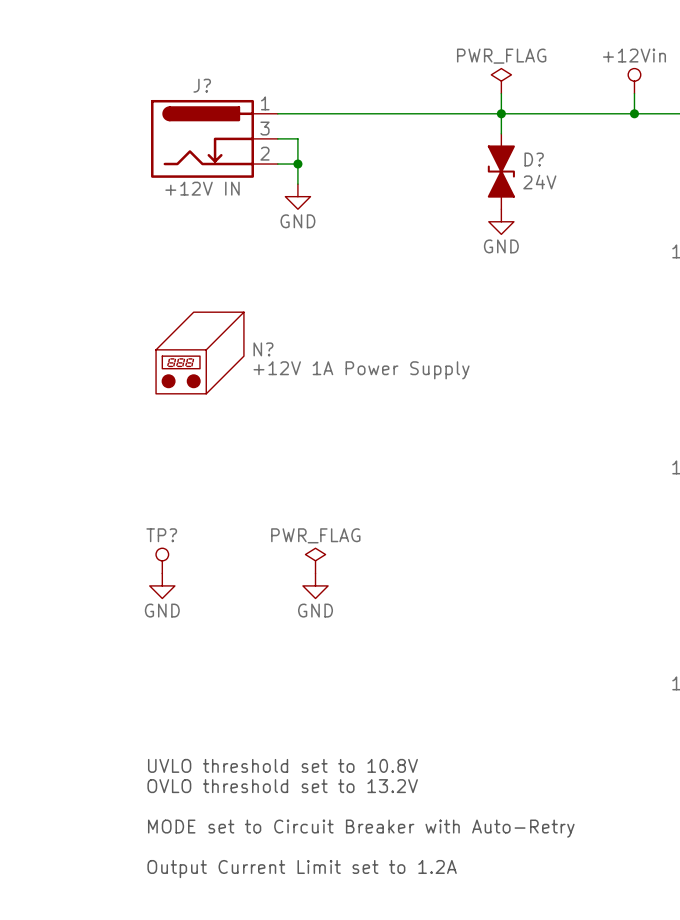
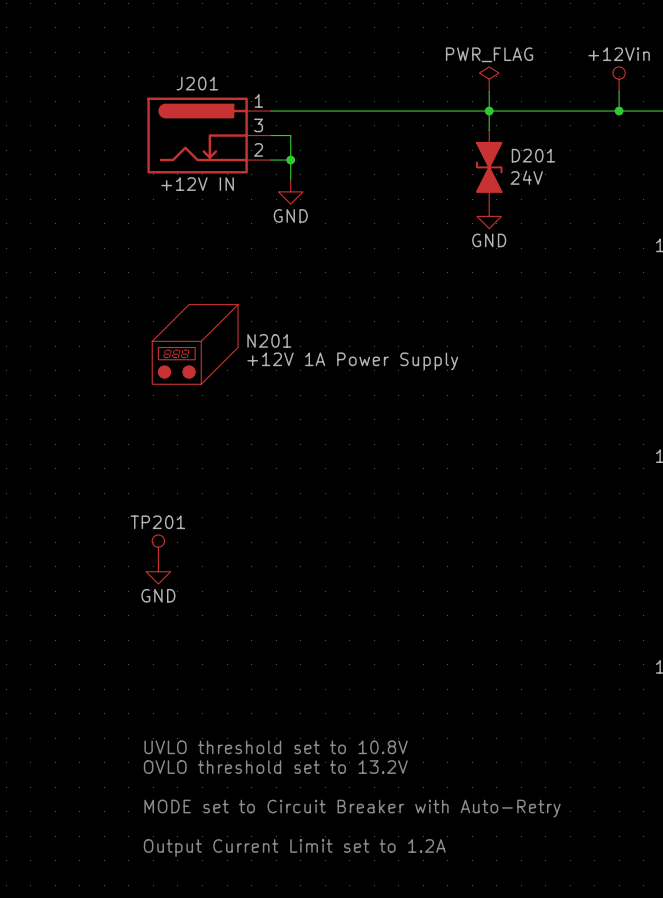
J? name: J? (202, 85) -> J201 (197, 83)
D? name: D? (534, 159) -> D201 (533, 155)
N? name: N? (263, 349) -> N201 (269, 340)
TP? name: TP? (161, 535) -> TP201 (157, 522)
power symbol: PWR_FLAG (315, 560) -> none
power symbol: GND (315, 585) -> none

